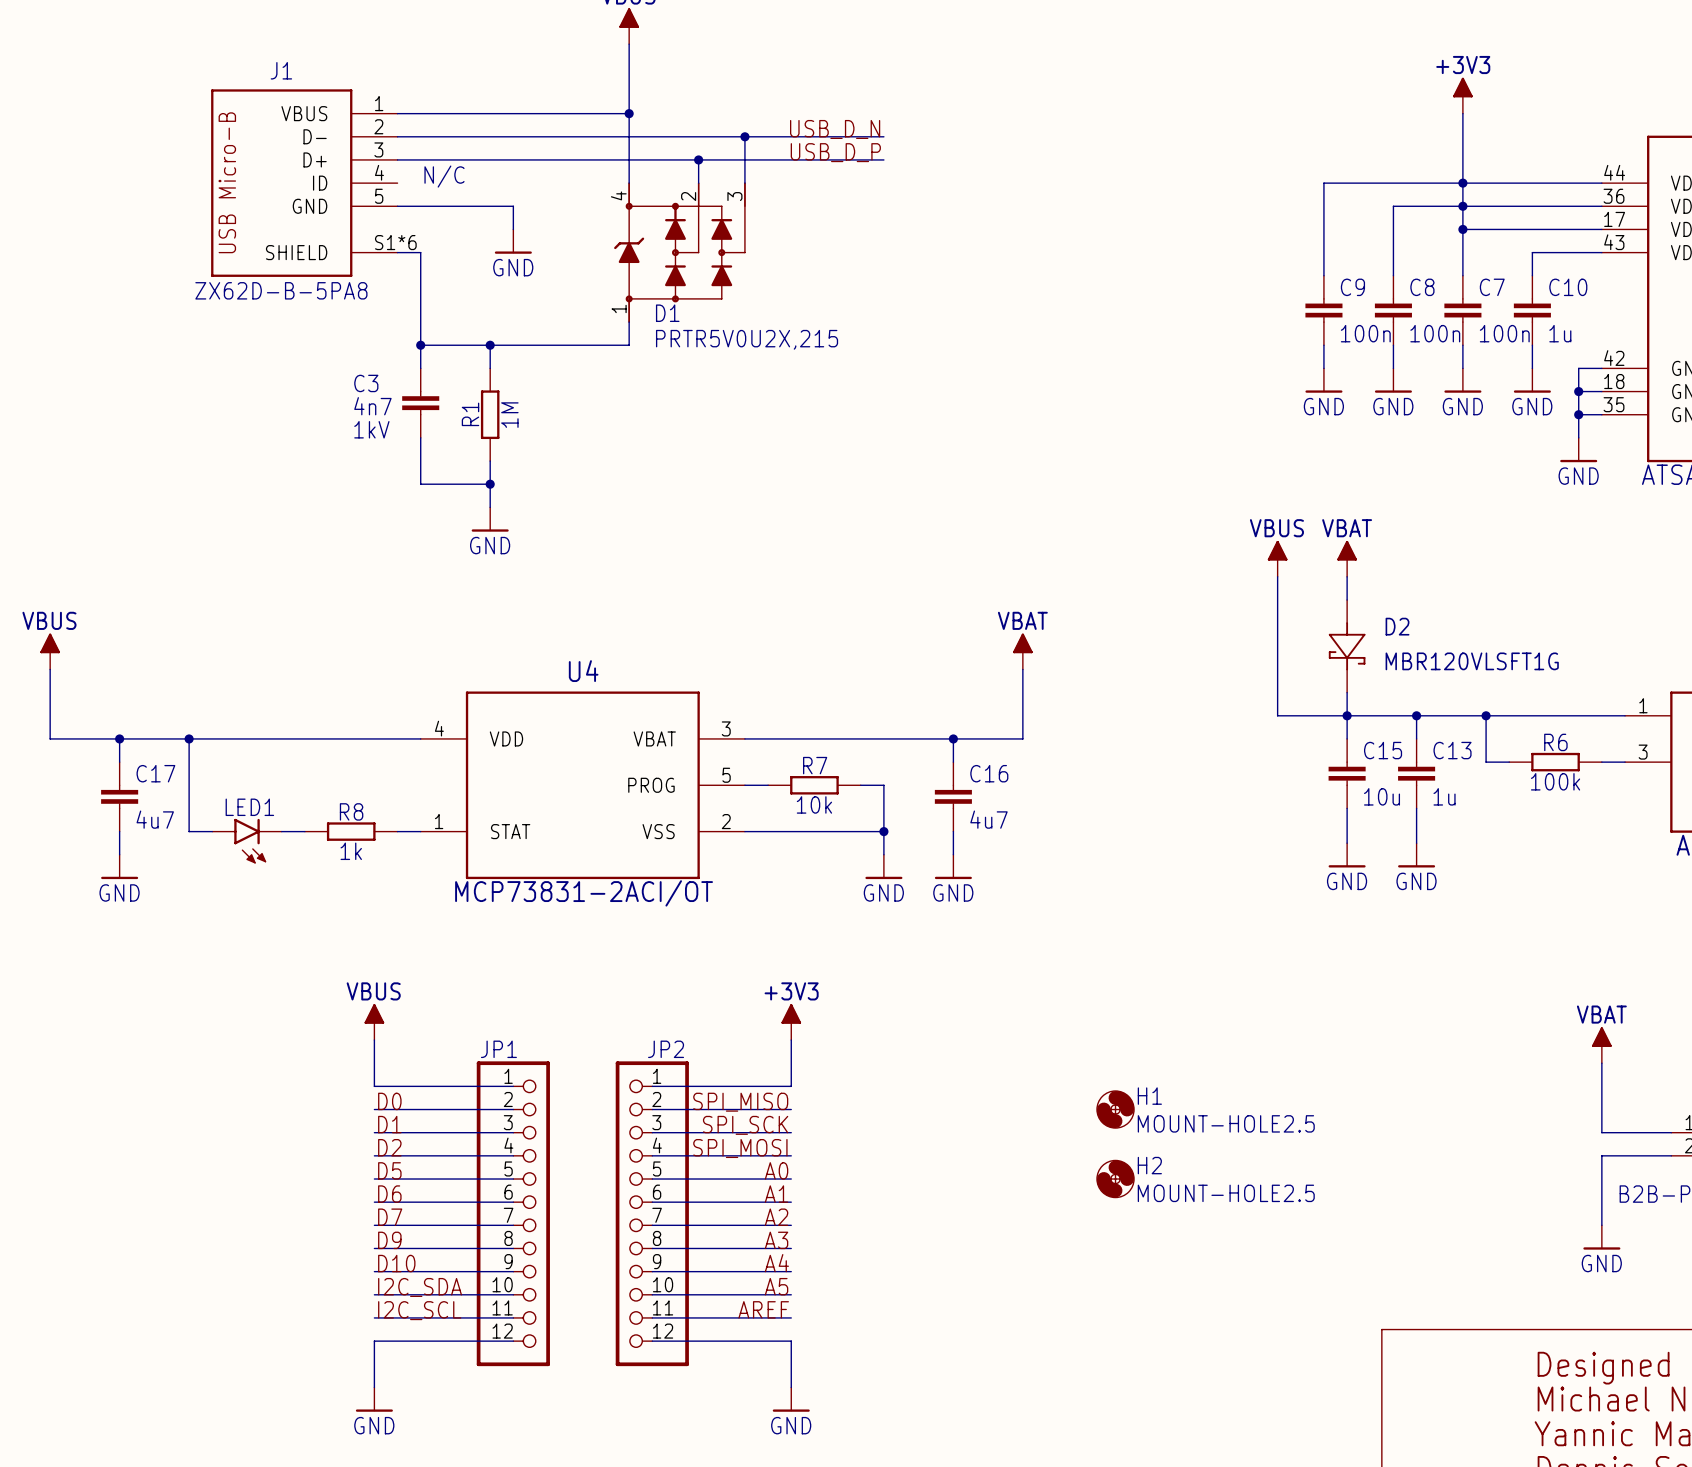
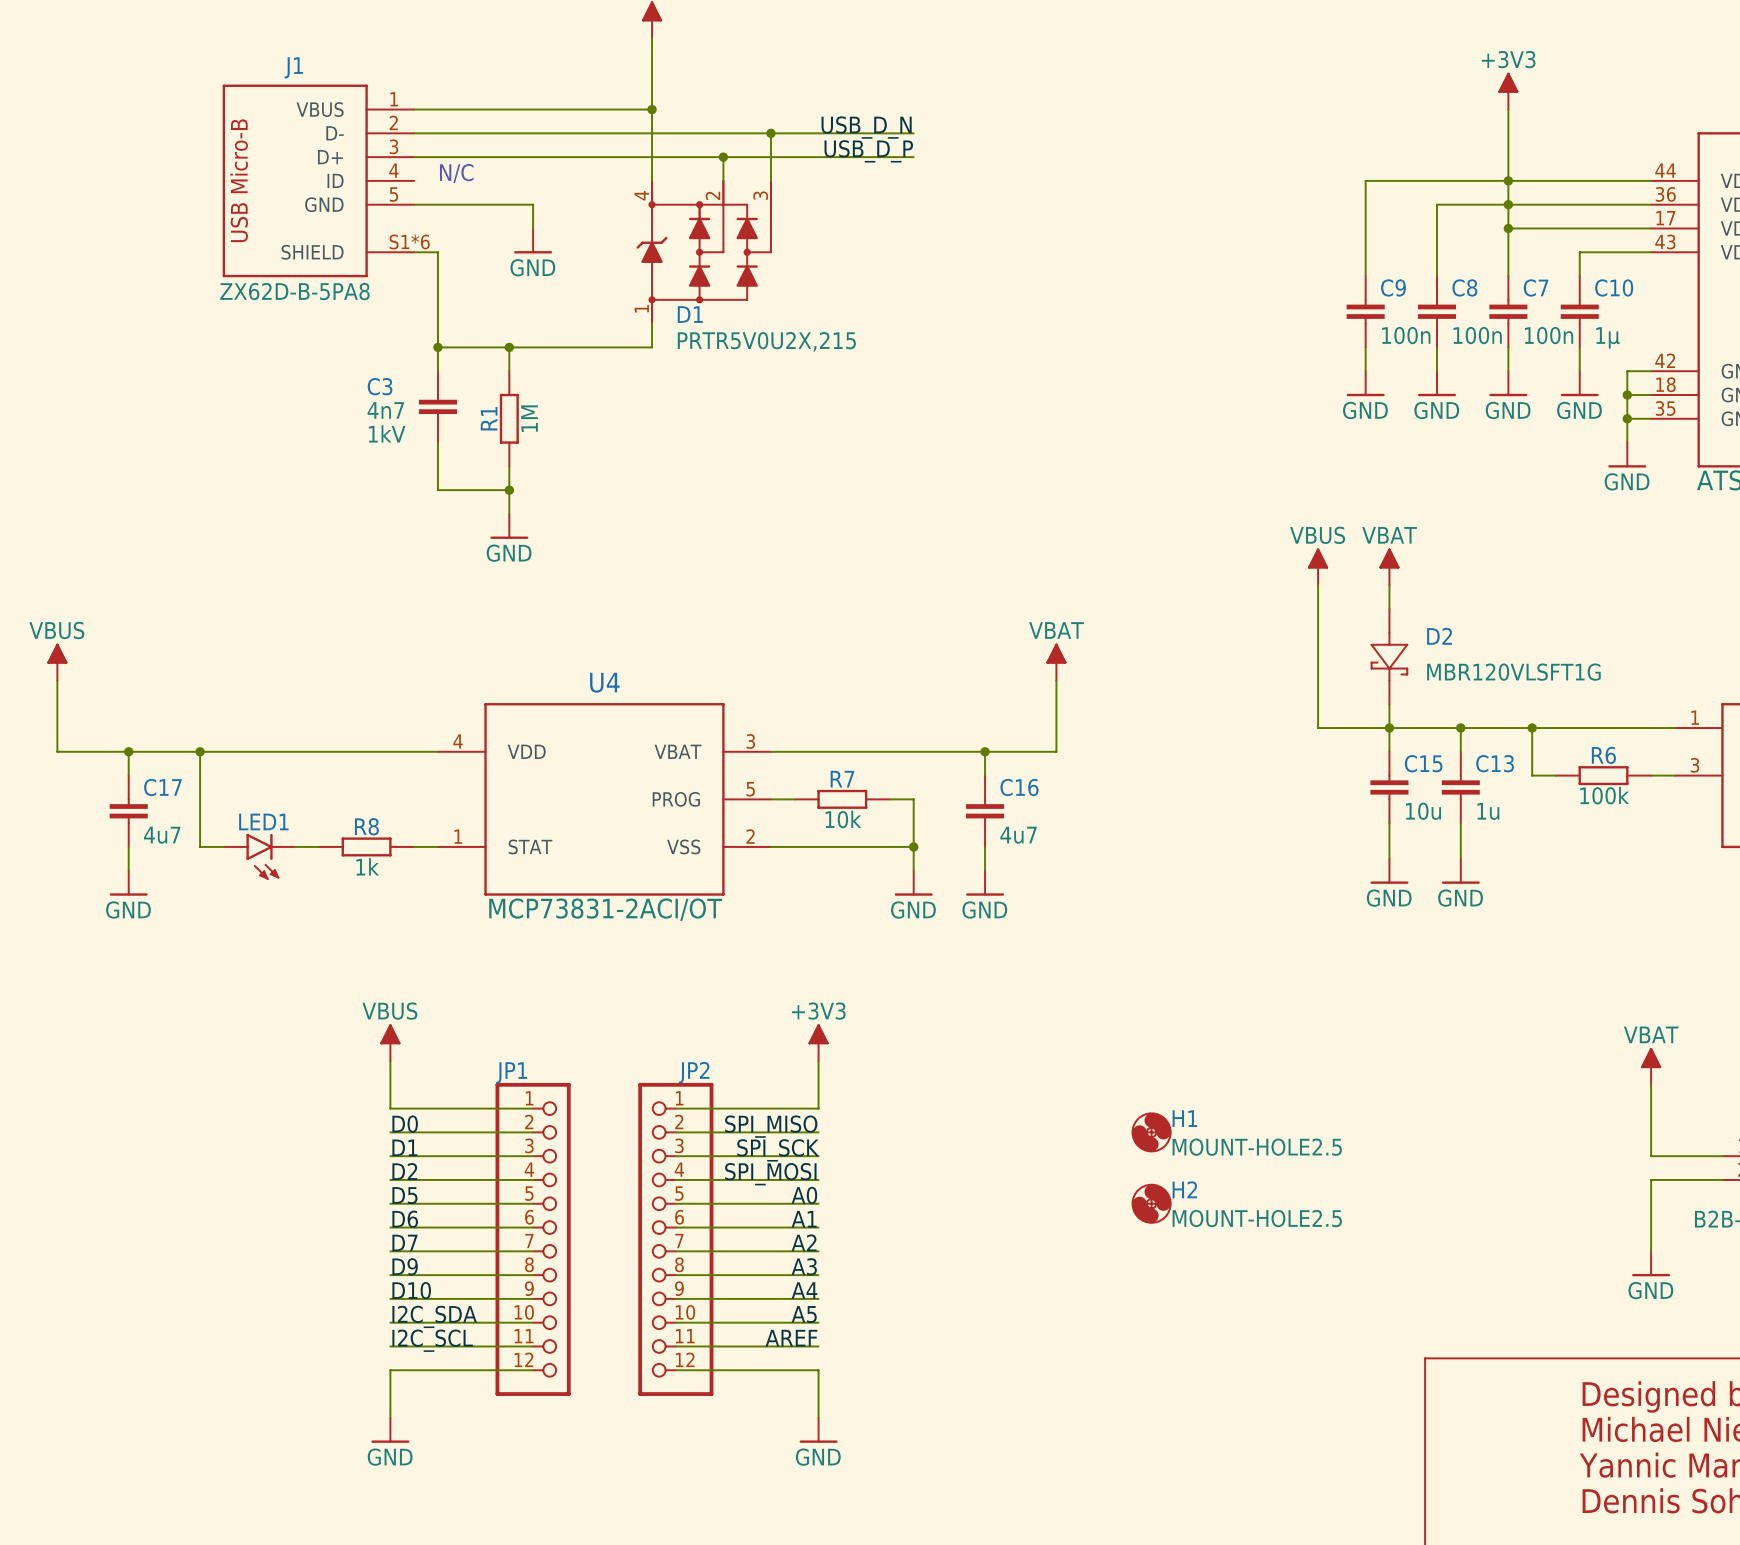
C10 value: 1u (1560, 333) -> 1µ (1607, 337)

